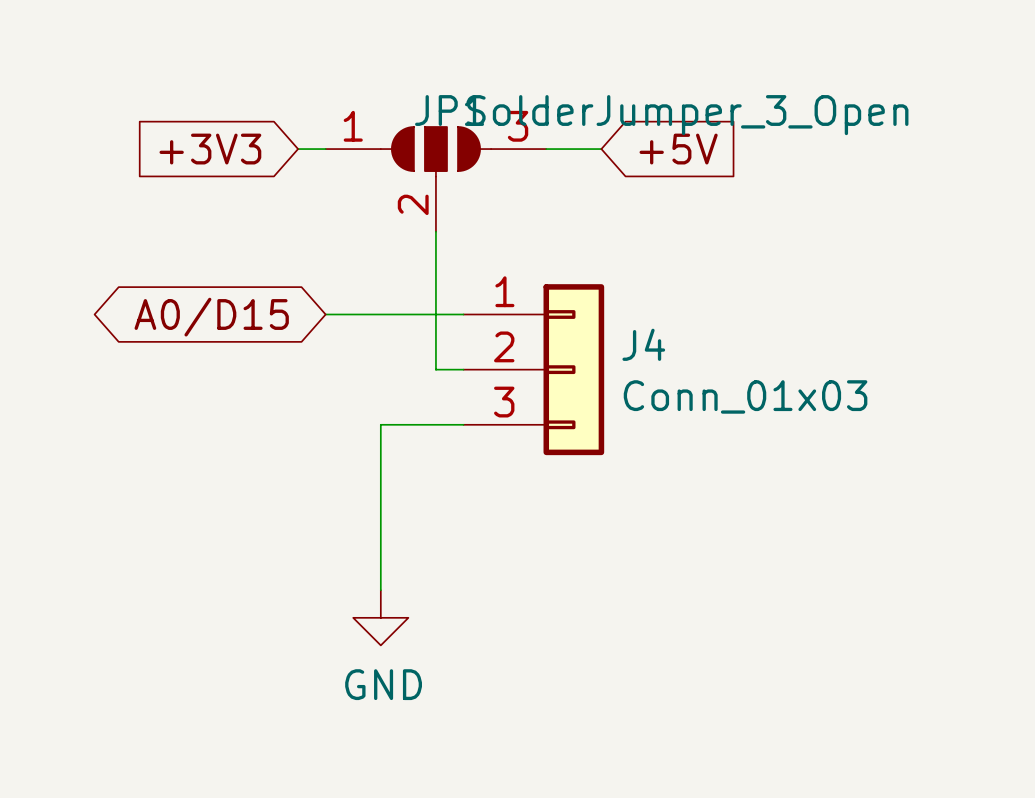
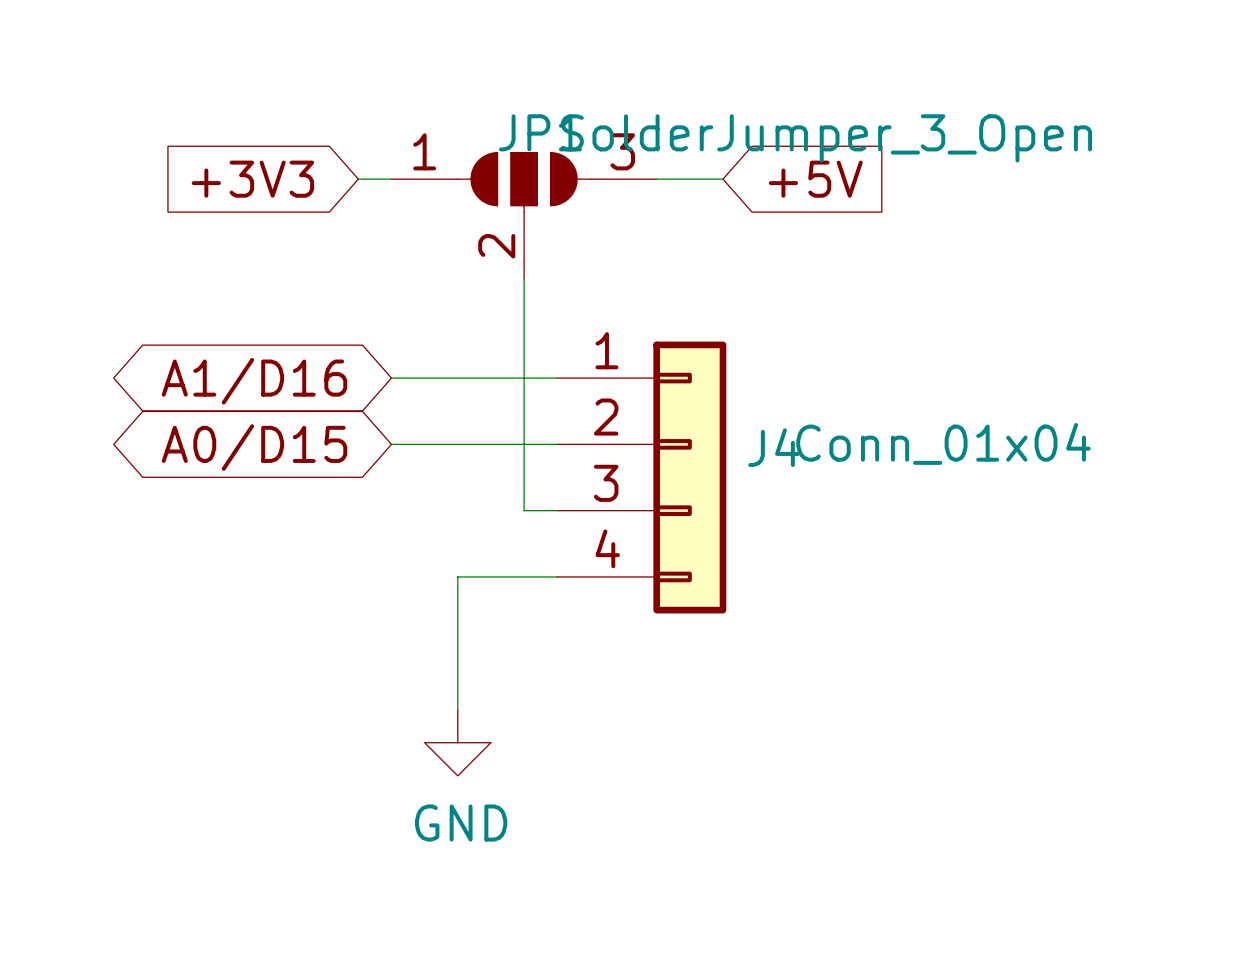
J4 symbol: [463, 284, 605, 456] -> [557, 341, 727, 614]
global label: A0/D15 (211, 317) -> A1/D16 (254, 381)
wire: none -> (391, 444) (524, 444) (524, 510)
global label: none -> A0/D15 (254, 447)
J4 value: Conn_01x03 (745, 396) -> Conn_01x04 (943, 443)
wire: (435, 424) (380, 424) (380, 479) -> (557, 576) (457, 576)

